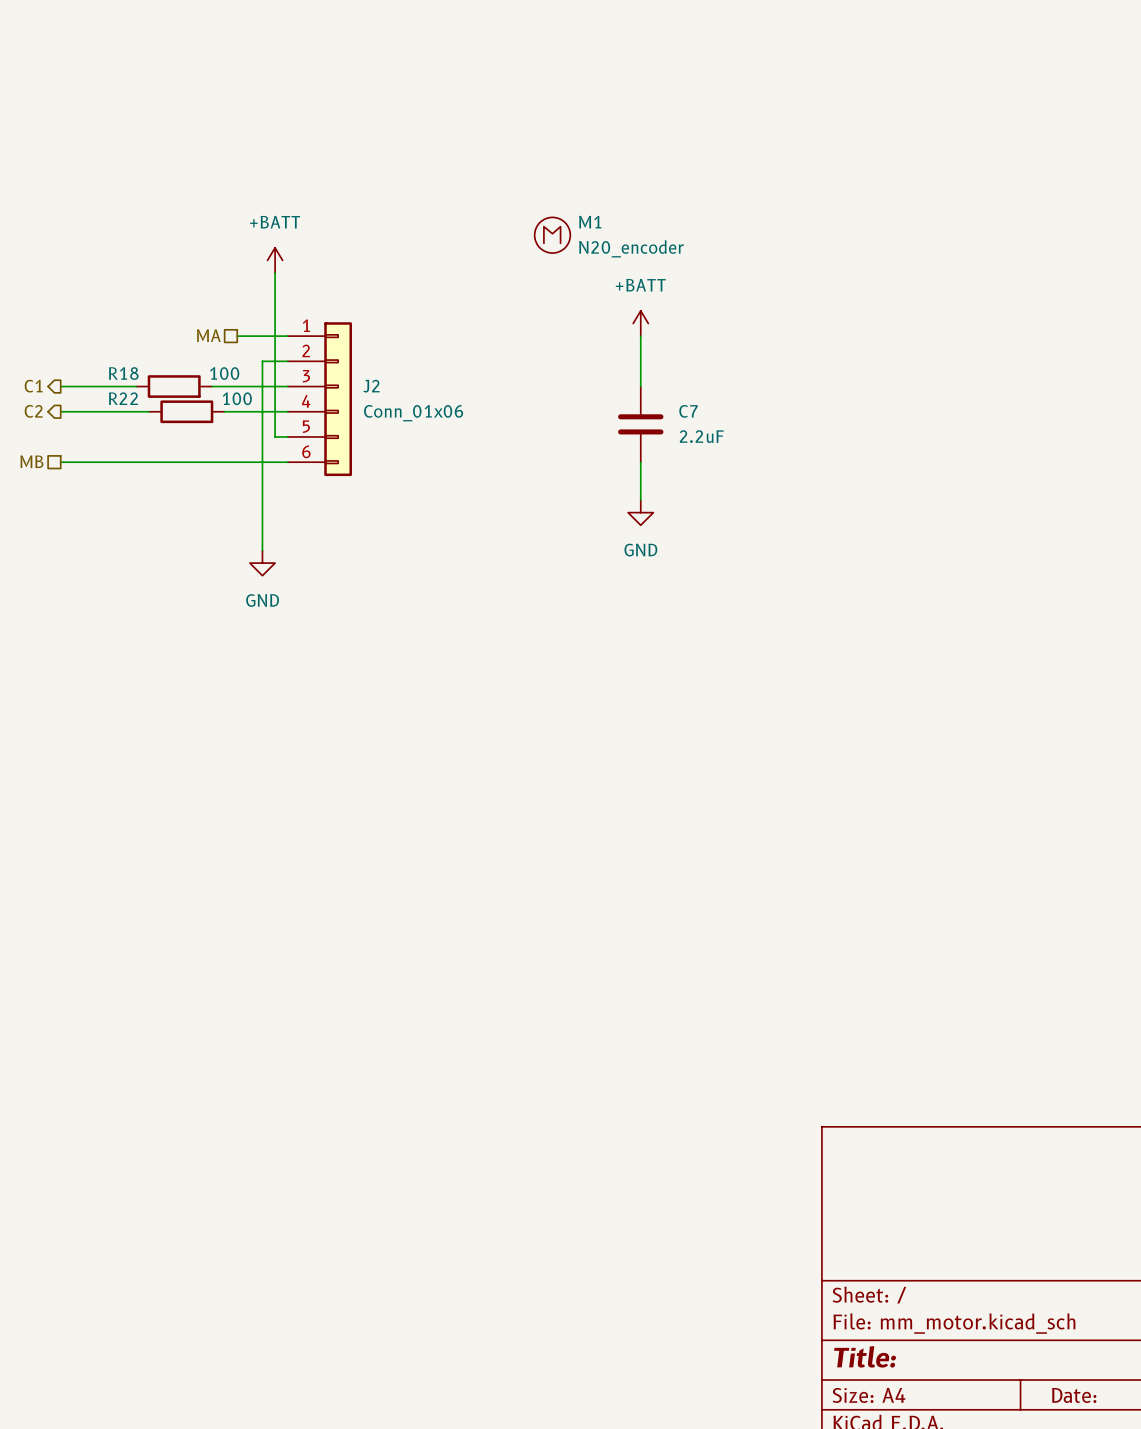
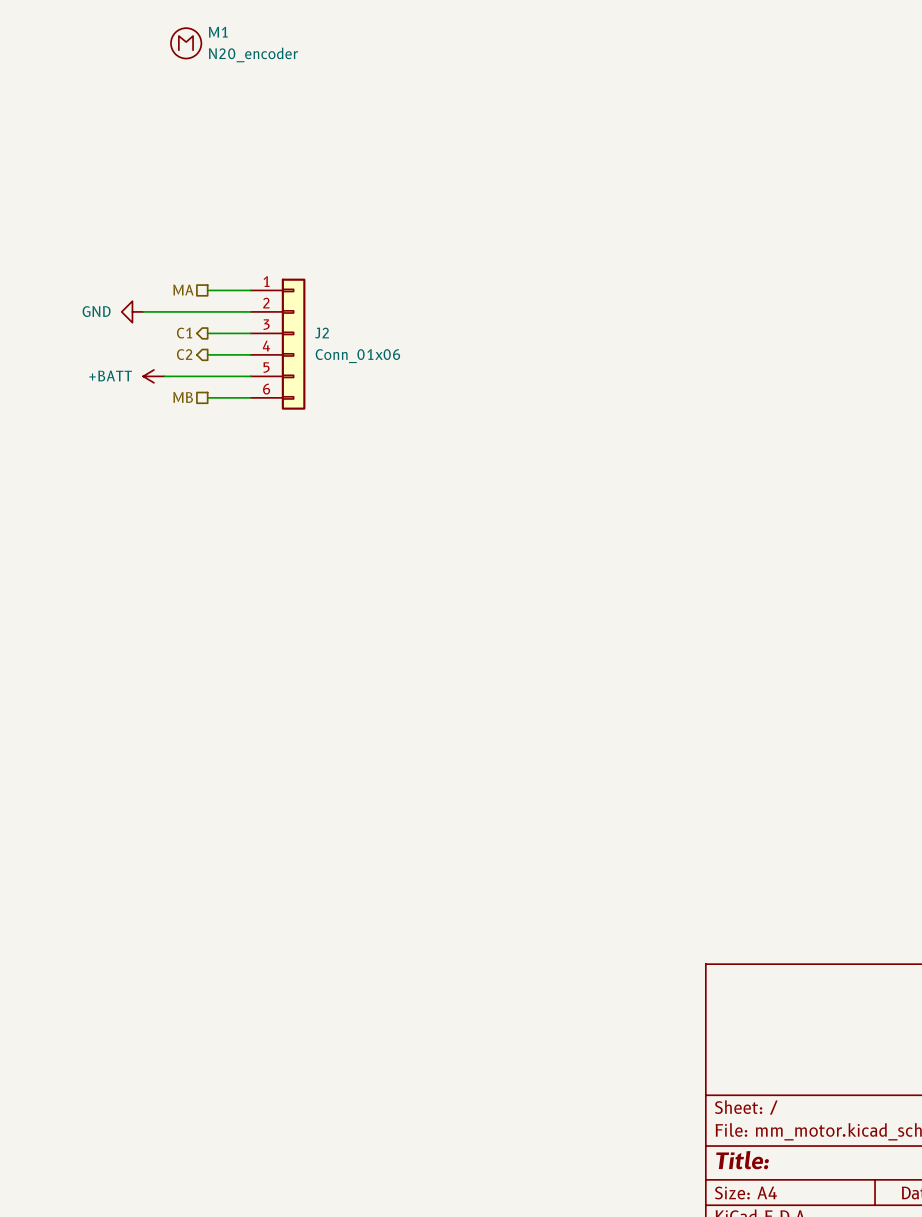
power symbol text position: +BATT (275, 222) -> +BATT (110, 375)
M1 position: (552, 235) -> (186, 43)
power symbol rotation: 0° (275, 260) -> 90° counterclockwise (153, 376)
power symbol position: +BATT (275, 260) -> +BATT (153, 376)
wire: (275, 273) (275, 436) -> (164, 376) (239, 376)
power symbol: +BATT (640, 323) -> none
wire: (640, 336) (640, 386) -> none
wire: (262, 361) (262, 550) -> (229, 311) (143, 311)
hierarchical label position: C1 (33, 386) -> C1 (184, 333)
wire: (60, 386) (136, 386) -> none
R18: 100 (174, 386) -> none
wire: (212, 386) (237, 386) -> none
hierarchical label position: C2 (33, 411) -> C2 (184, 354)
wire: (60, 411) (148, 411) -> none
R22: 100 (186, 411) -> none
wire: (224, 411) (237, 411) -> none
C7: 2.2uF (640, 424) -> none
hierarchical label position: MB (31, 461) -> MB (183, 397)
wire: (60, 462) (237, 462) -> none
wire: (640, 462) (640, 500) -> none
power symbol: GND (640, 512) -> none
power symbol rotation: 0° (262, 563) -> 90° clockwise (132, 311)
power symbol position: GND (262, 563) -> GND (132, 311)

